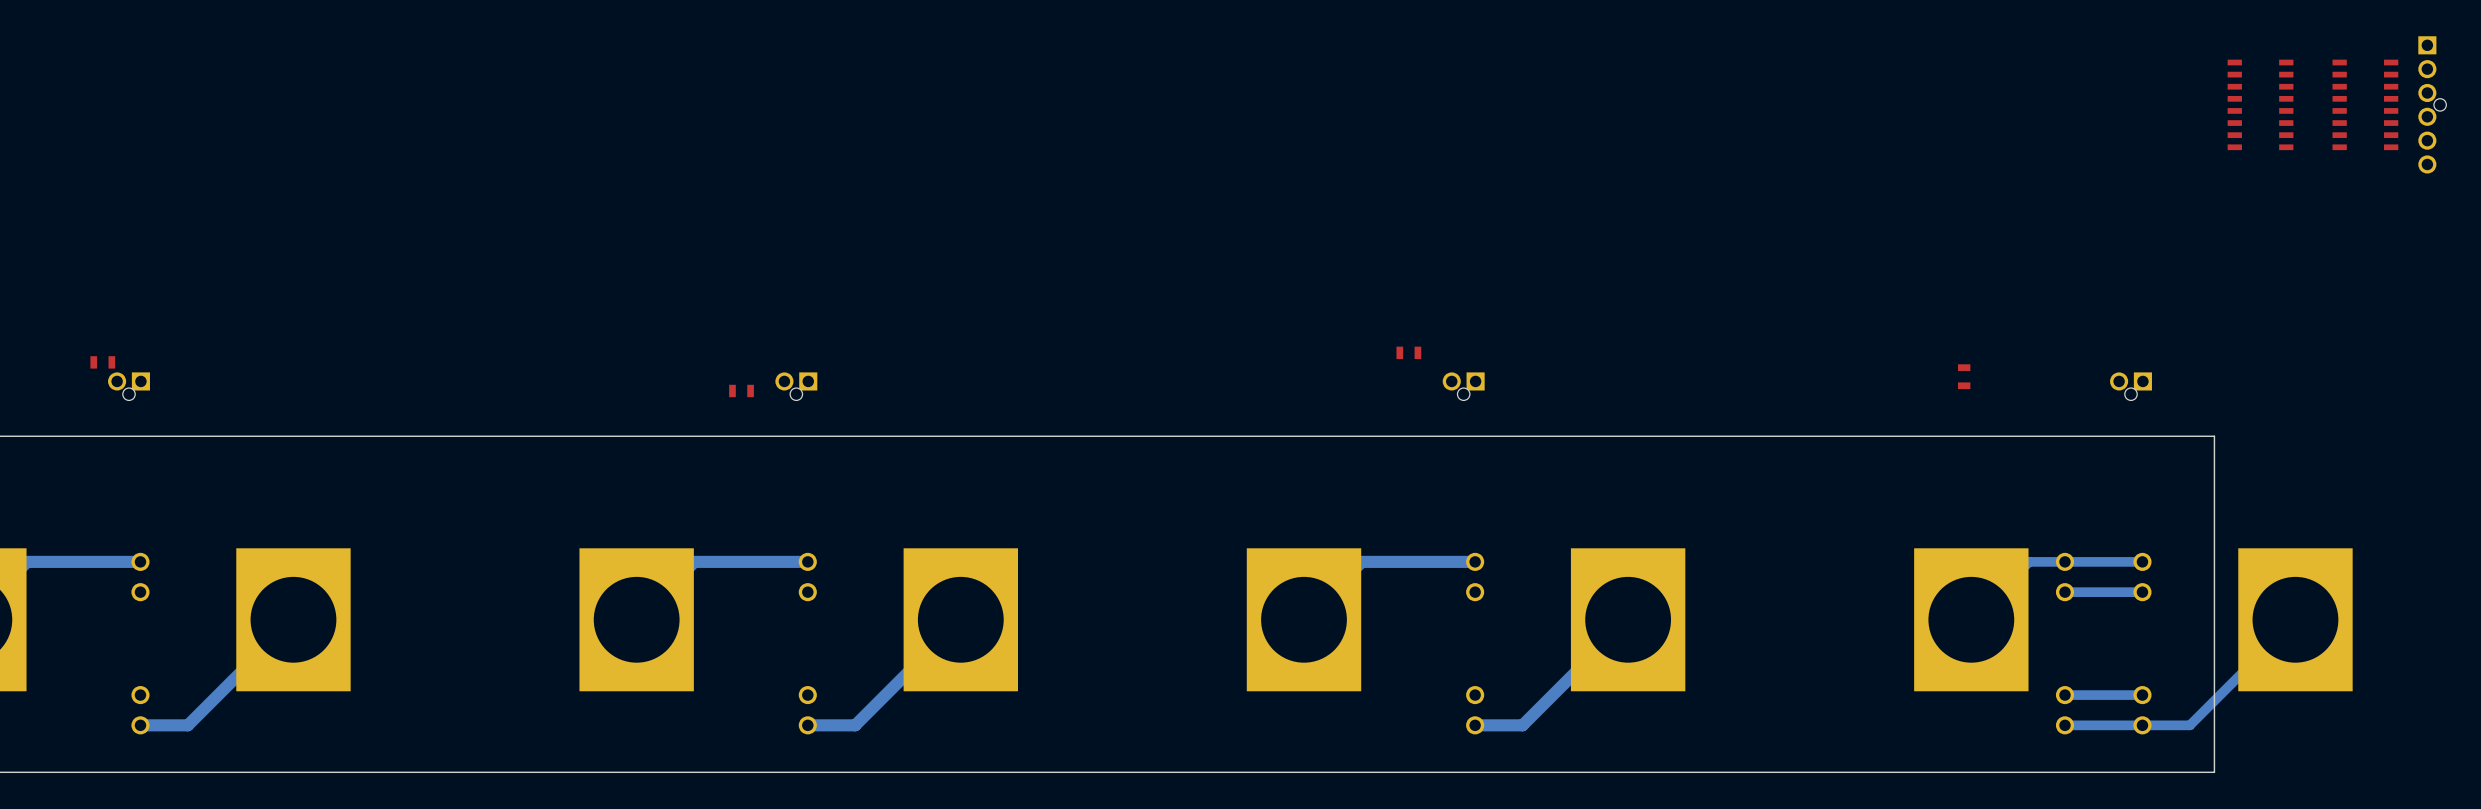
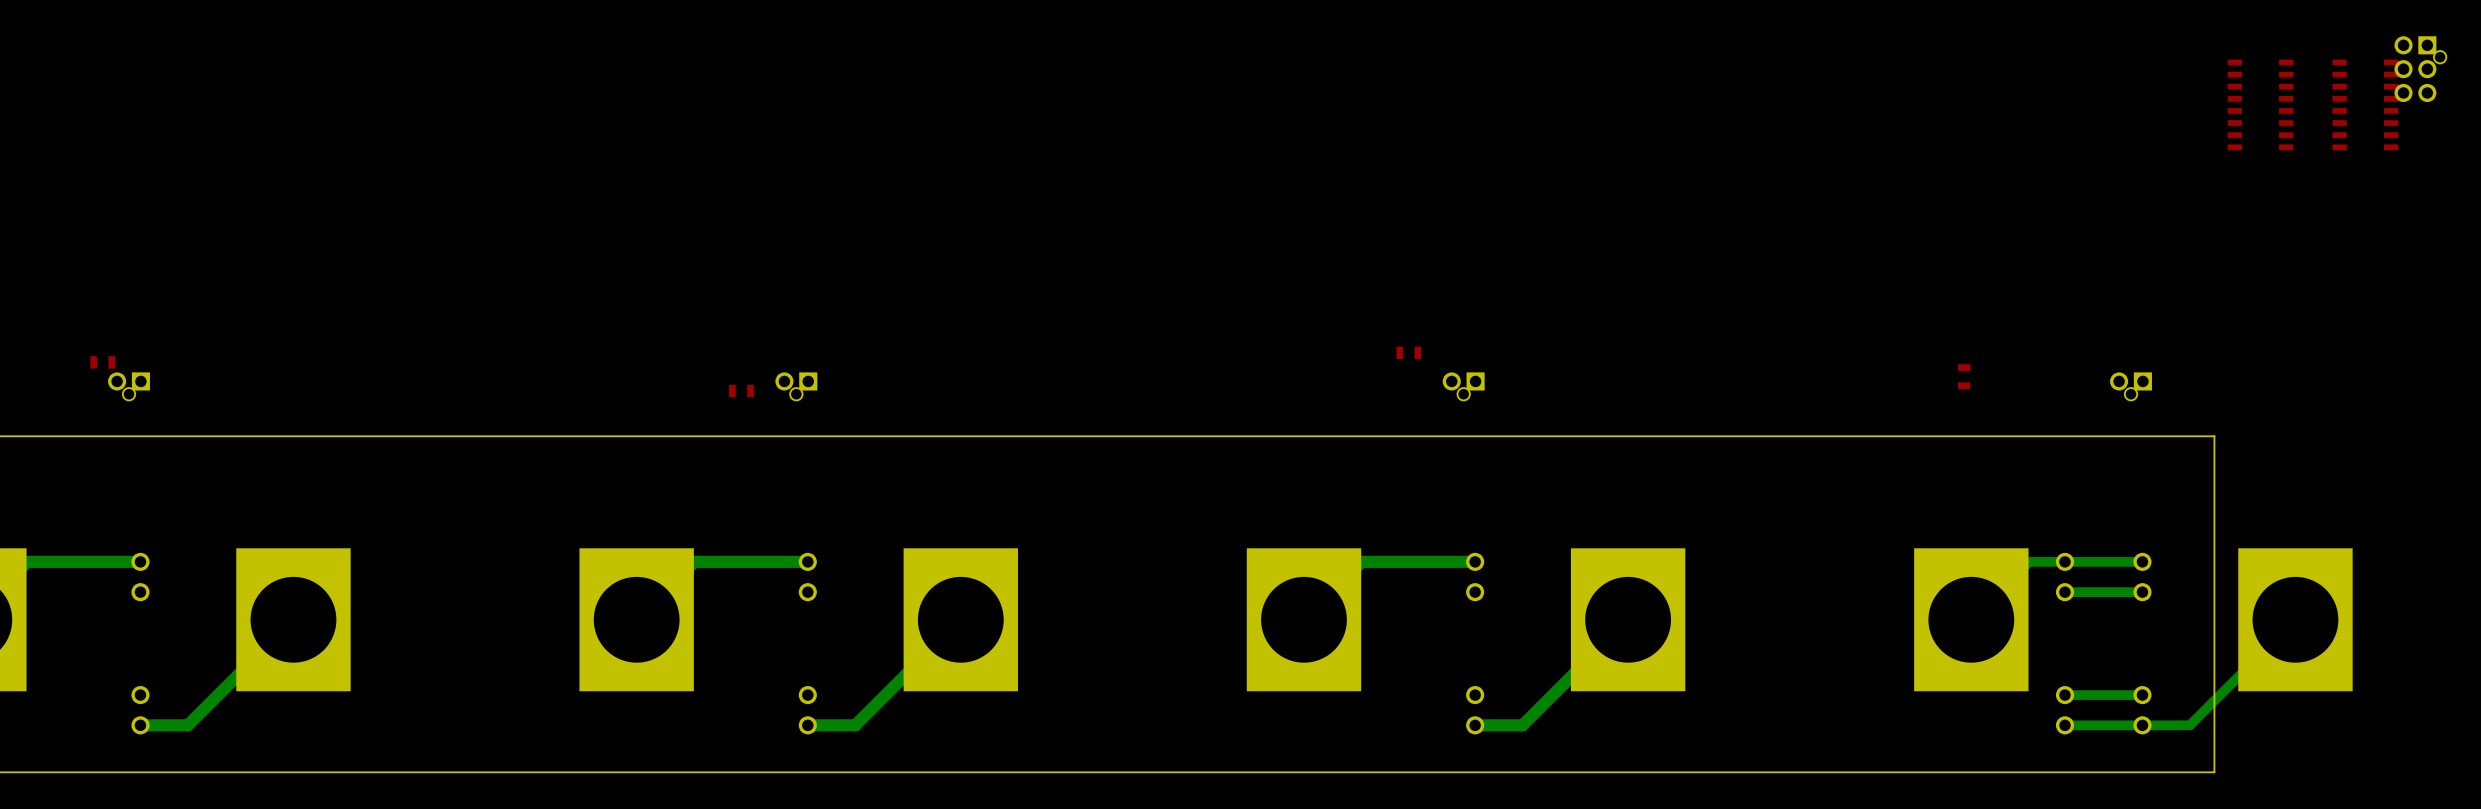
part: none -> (2420, 69)
part: (2432, 104) -> none

